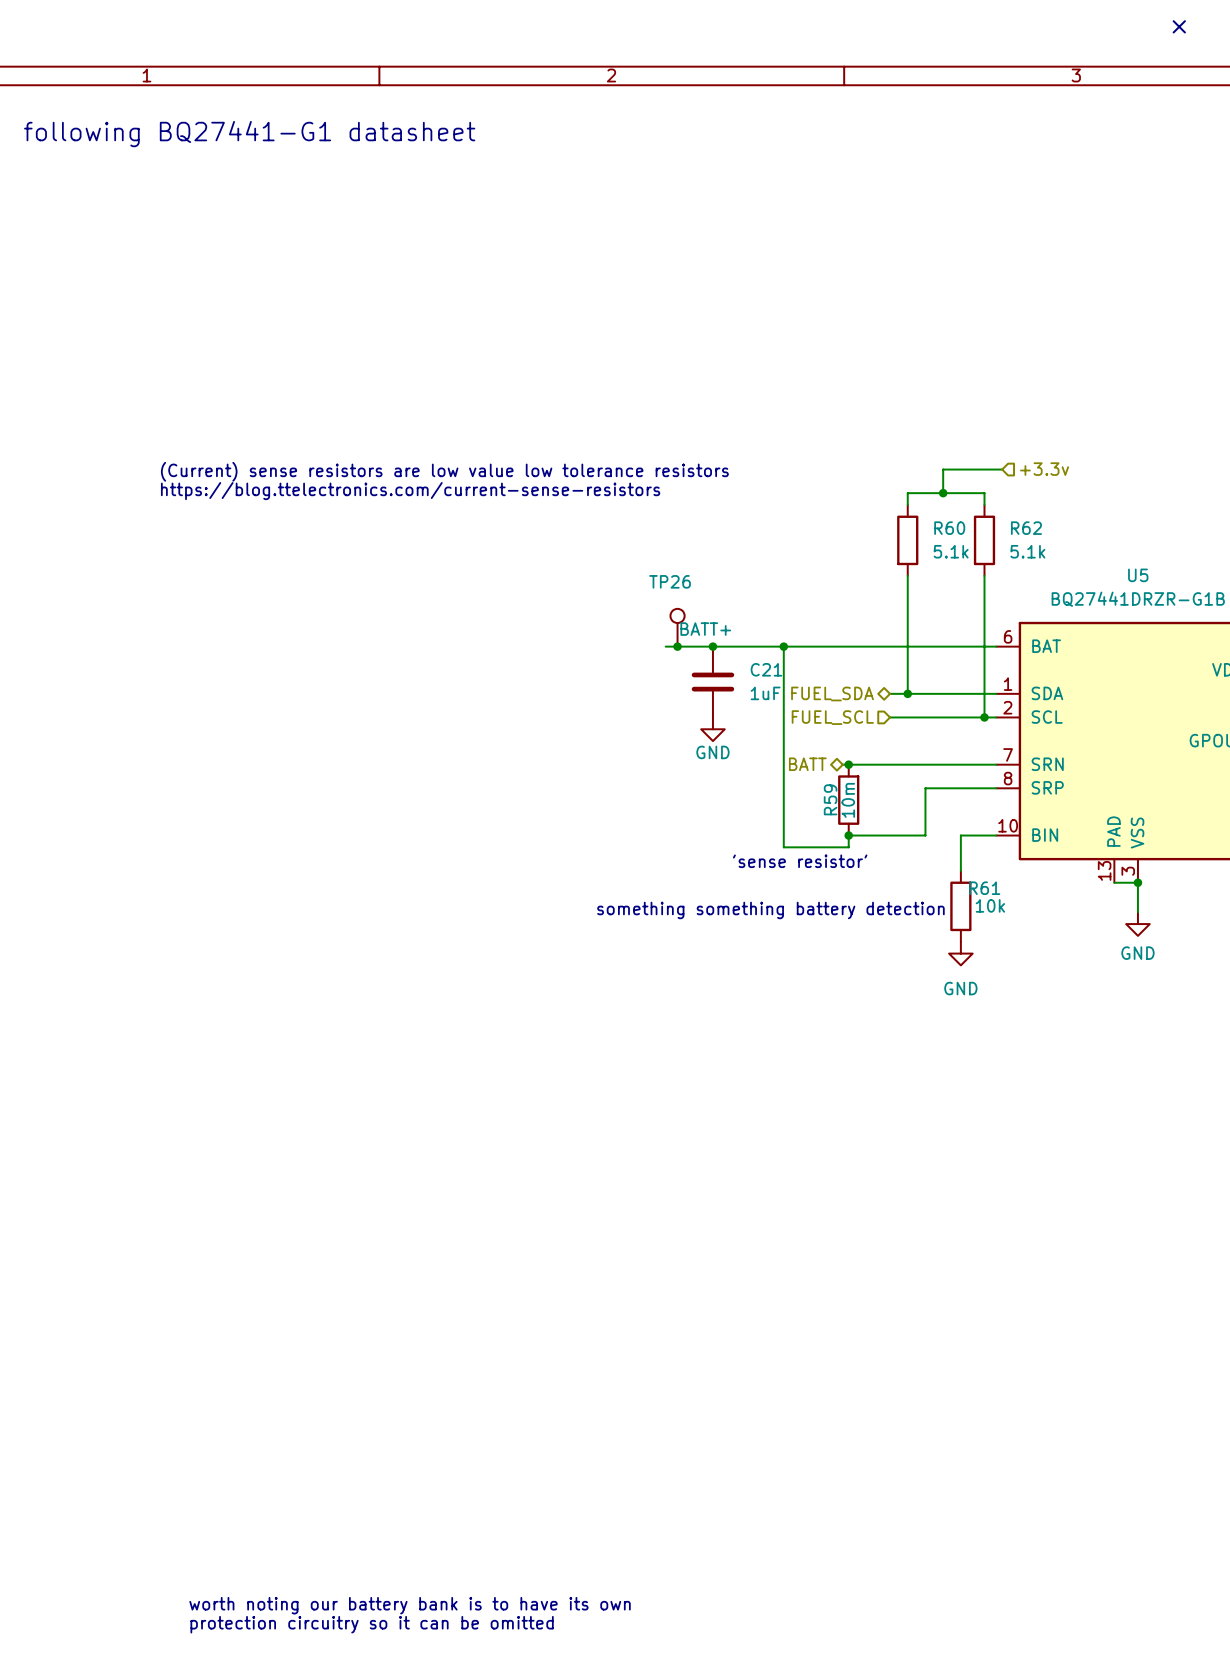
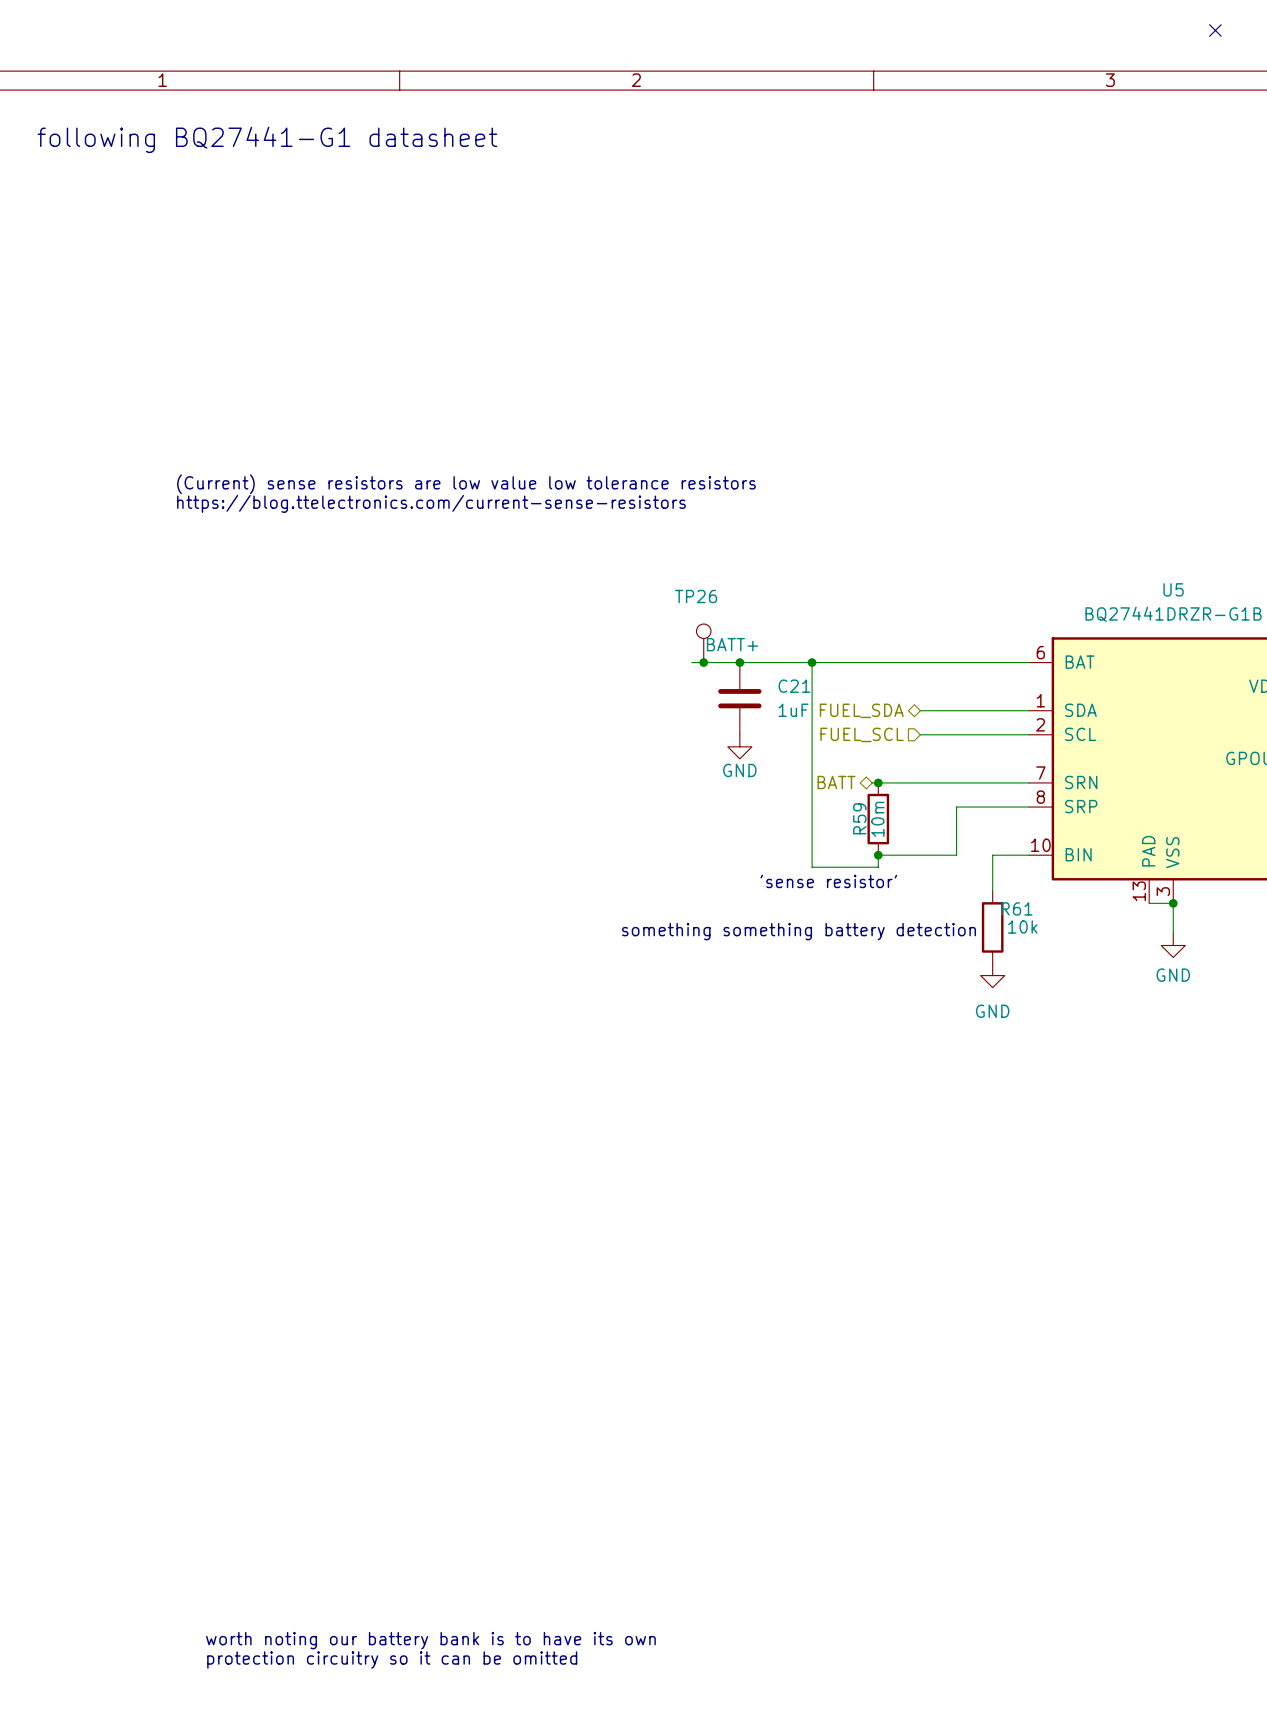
wire: (1002, 469) (943, 469) (943, 493) -> none
hierarchical label: +3.3v (1044, 469) -> none
junction: (943, 493) -> none
wire: (907, 504) (907, 493) (984, 493) (984, 504) -> none
R60: 5.1k (907, 540) -> none
R62: 5.1k (984, 540) -> none
wire: (907, 575) (907, 693) -> none
wire: (984, 575) (984, 717) -> none
junction: (907, 693) -> none
junction: (984, 717) -> none

